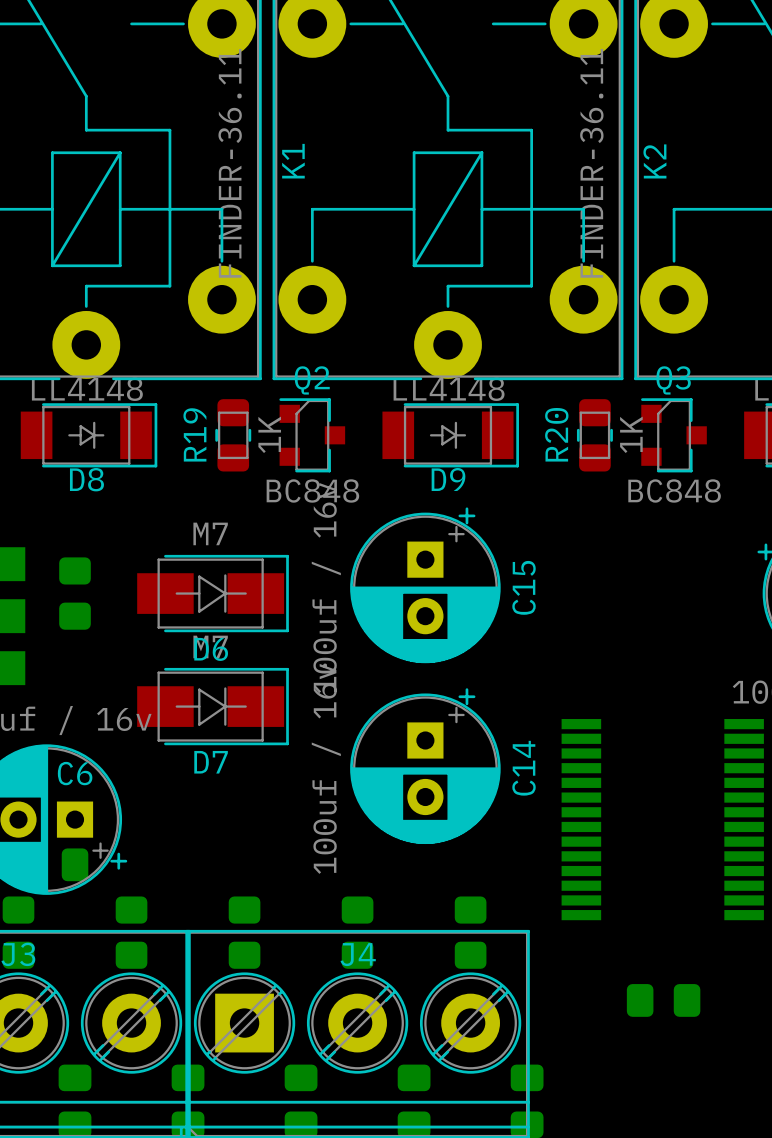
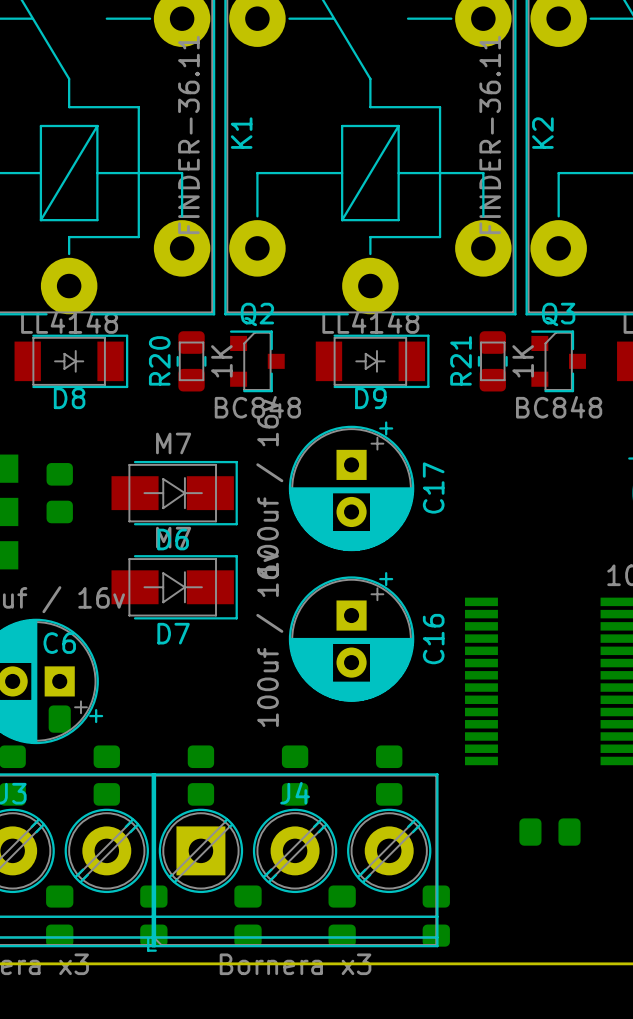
R19 name: R19 (194, 434) -> R20 (159, 360)
R20 name: R20 (556, 434) -> R21 (461, 360)
C15 name: C15 (524, 587) -> C17 (433, 487)
C14 name: C14 (524, 768) -> C16 (433, 639)

